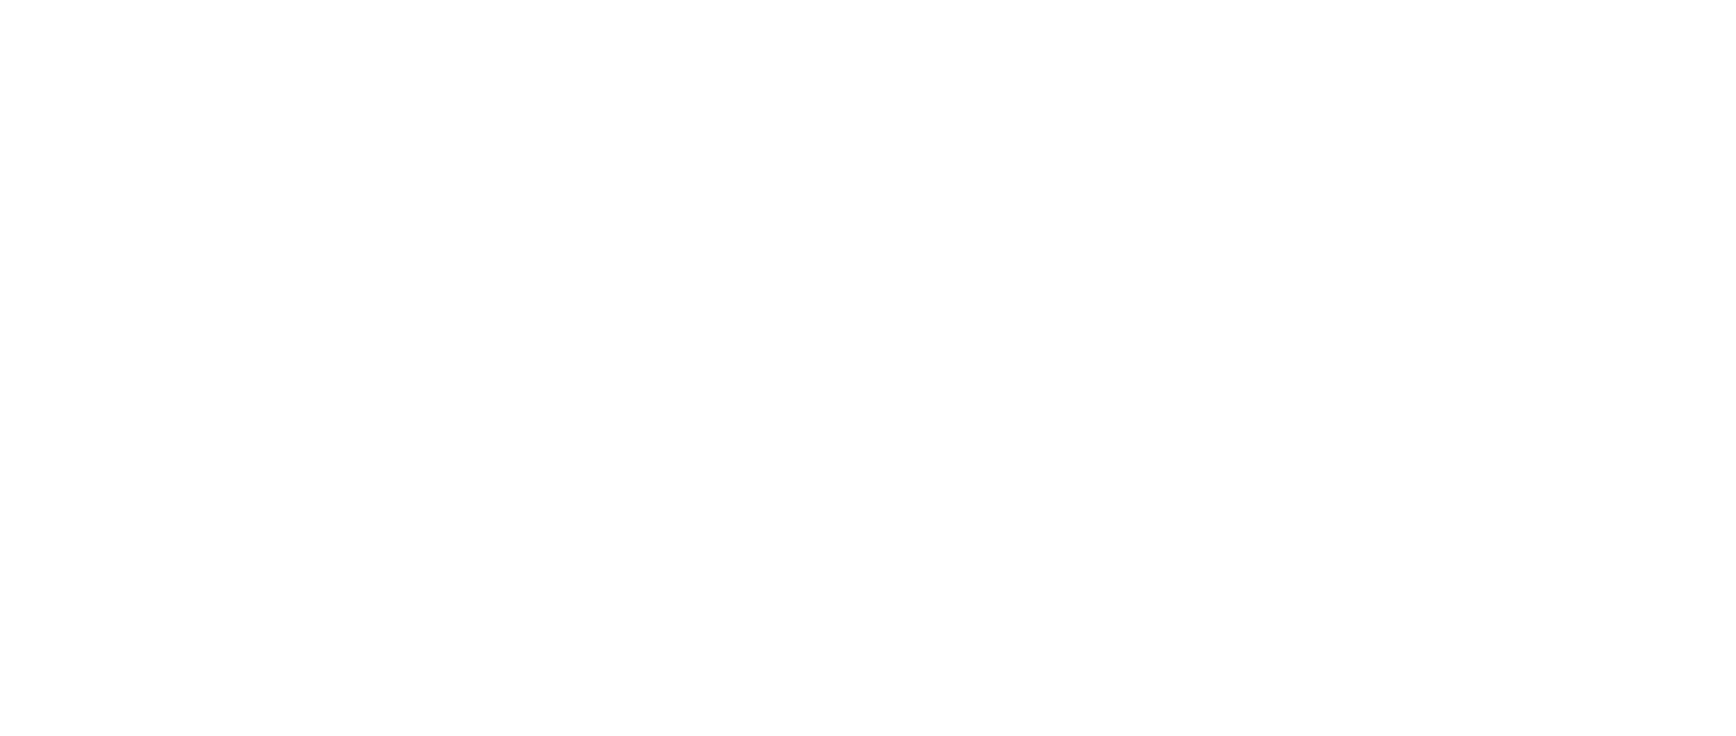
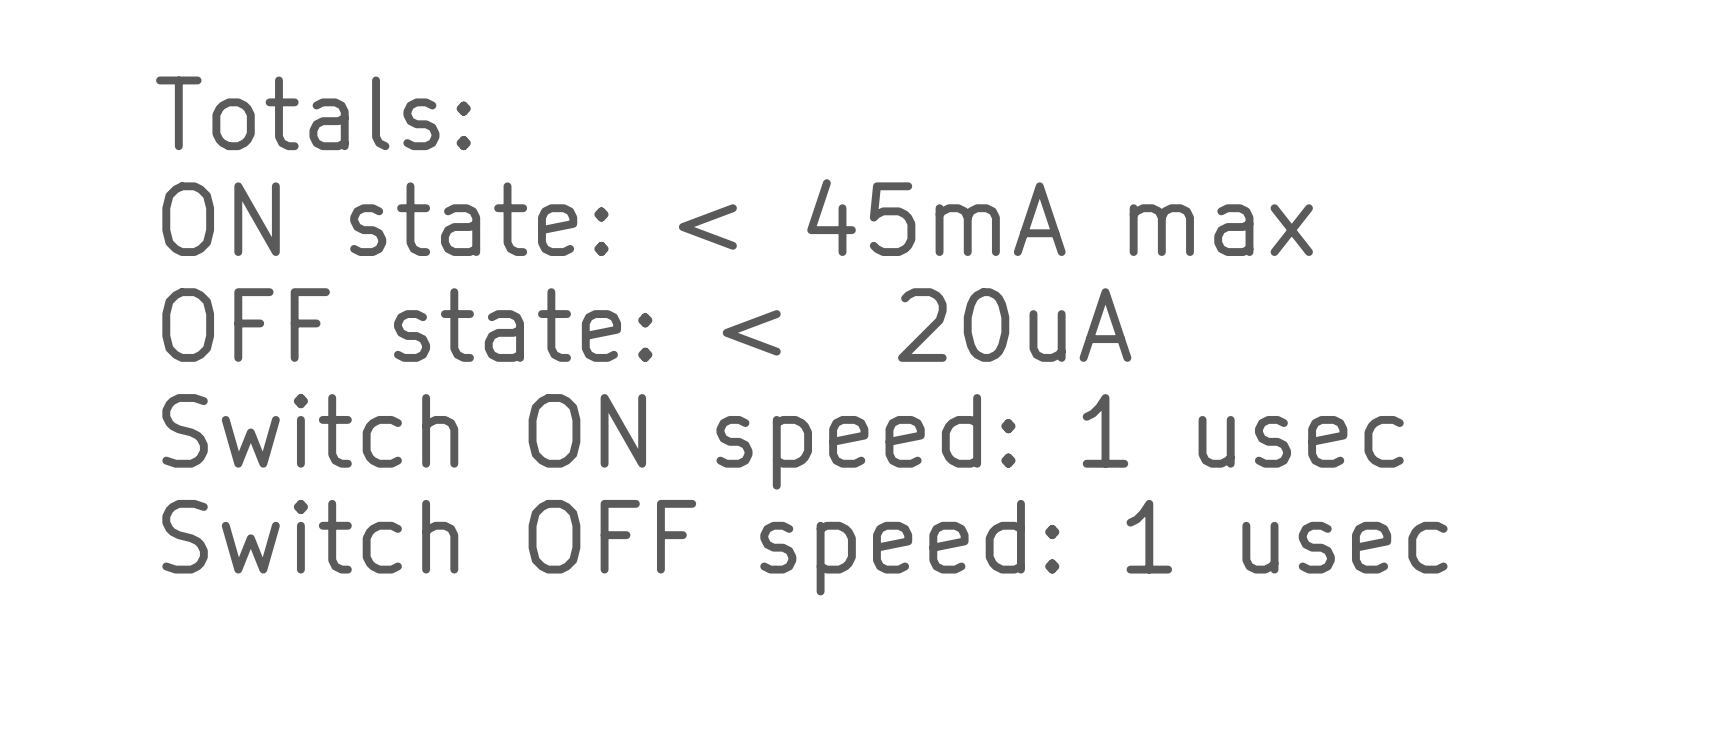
text: none -> Totals: (313, 113)
text: none -> ON state: < 45mA max (737, 217)
text: none -> OFF state: < 20uA (646, 325)
text: none -> Switch ON speed: 1 usec (783, 441)
text: none -> Switch OFF speed: 1 usec (804, 547)

